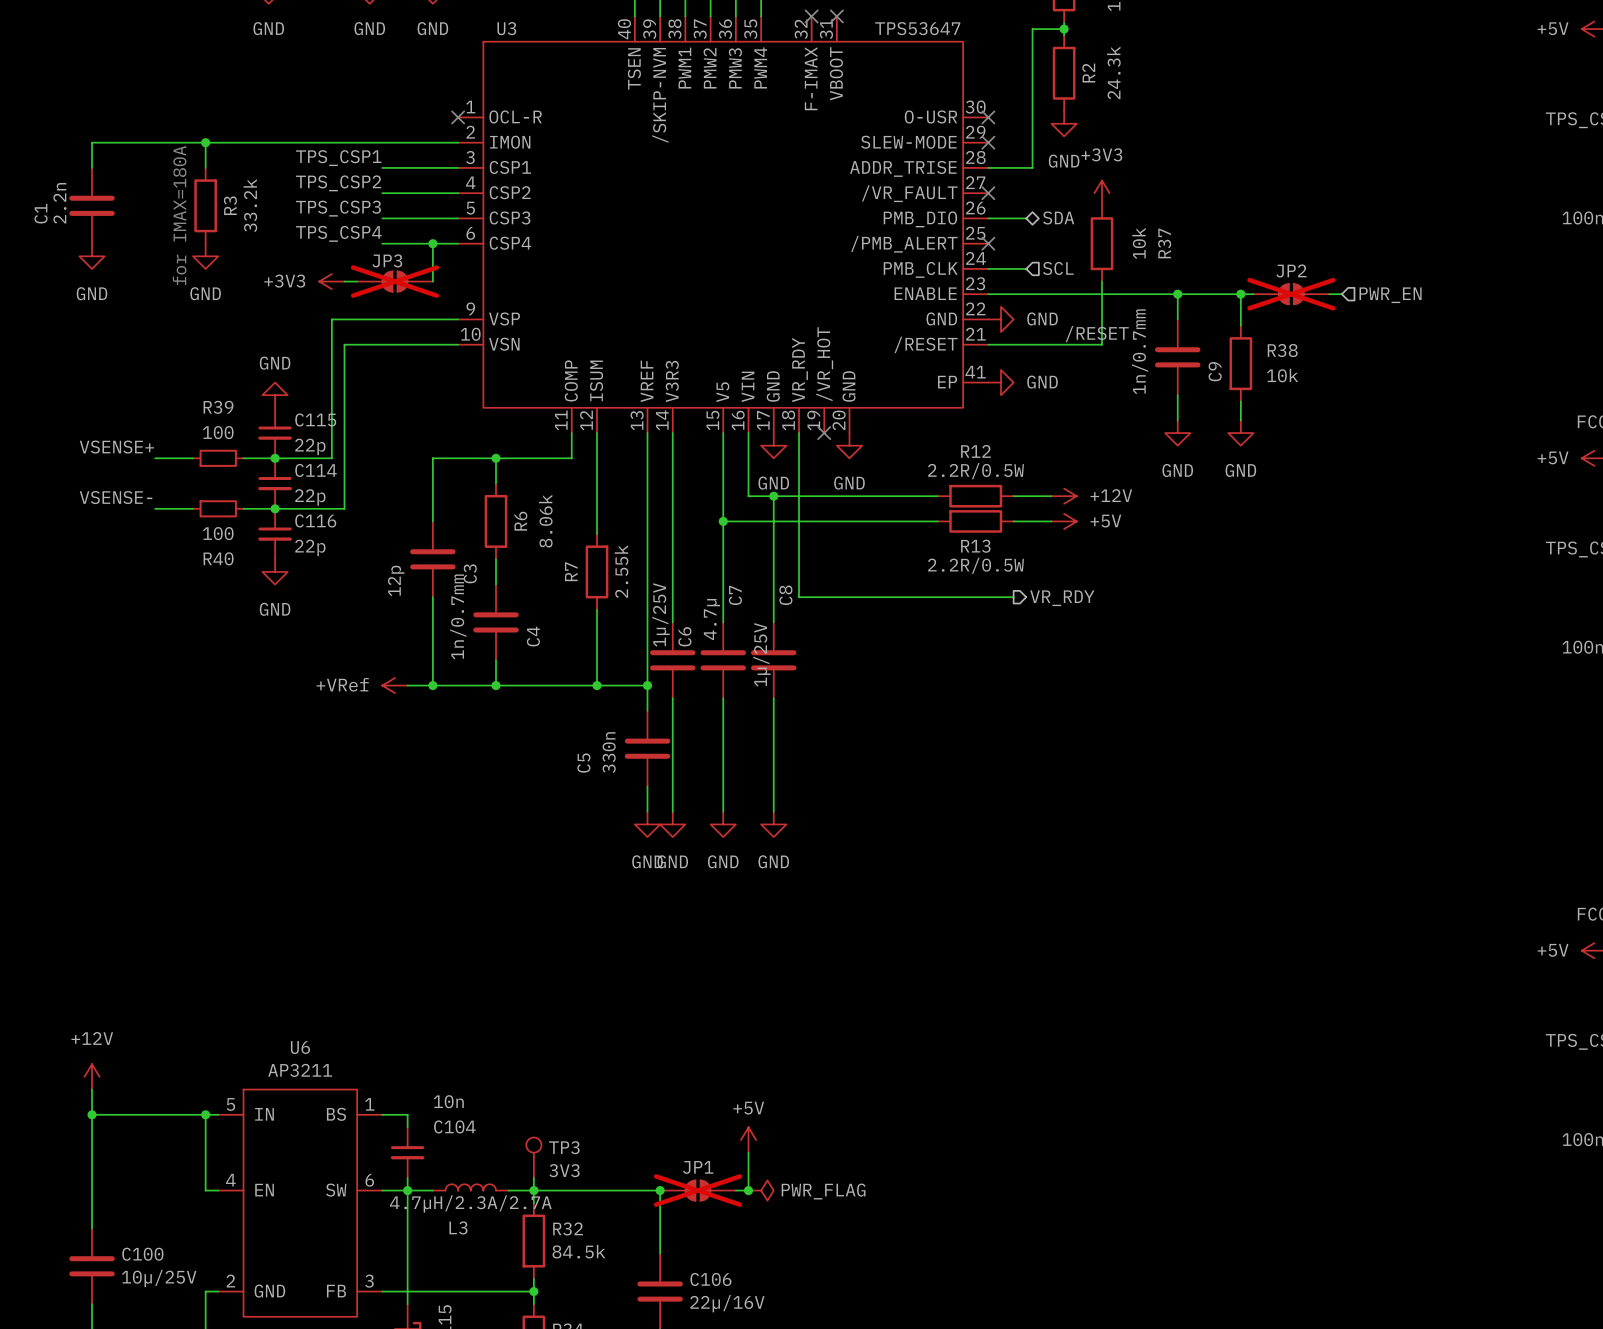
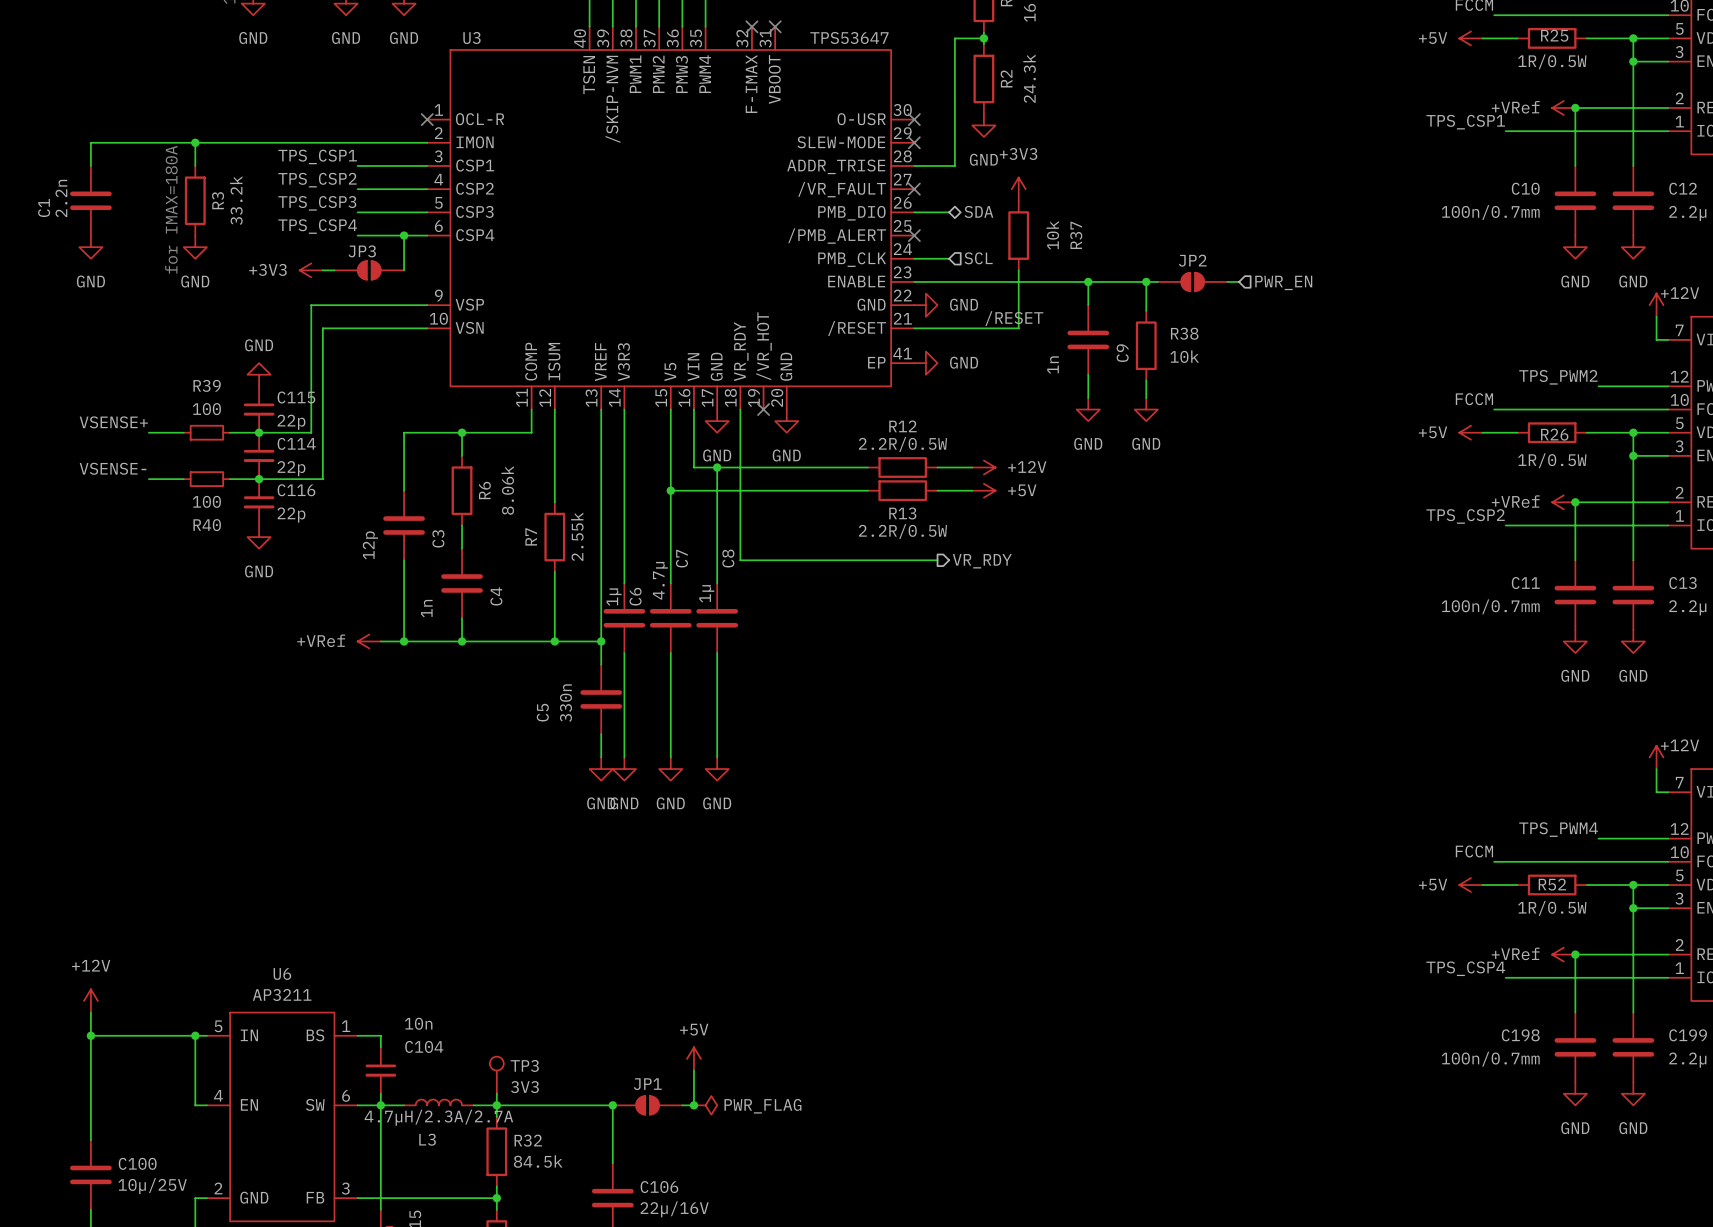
JP3 do-not-place cross: (395, 281) -> none
JP2 do-not-place cross: (1291, 294) -> none
C9 value: 1n/0.7mm (1140, 351) -> 1n (1053, 365)
C6 value: 1µ/25V (660, 614) -> 1µ (614, 597)
C4 value: 1n/0.7mm (458, 616) -> 1n (426, 608)
C8 value: 1µ/25V (761, 654) -> 1µ (706, 593)
JP1 do-not-place cross: (698, 1190) -> none

